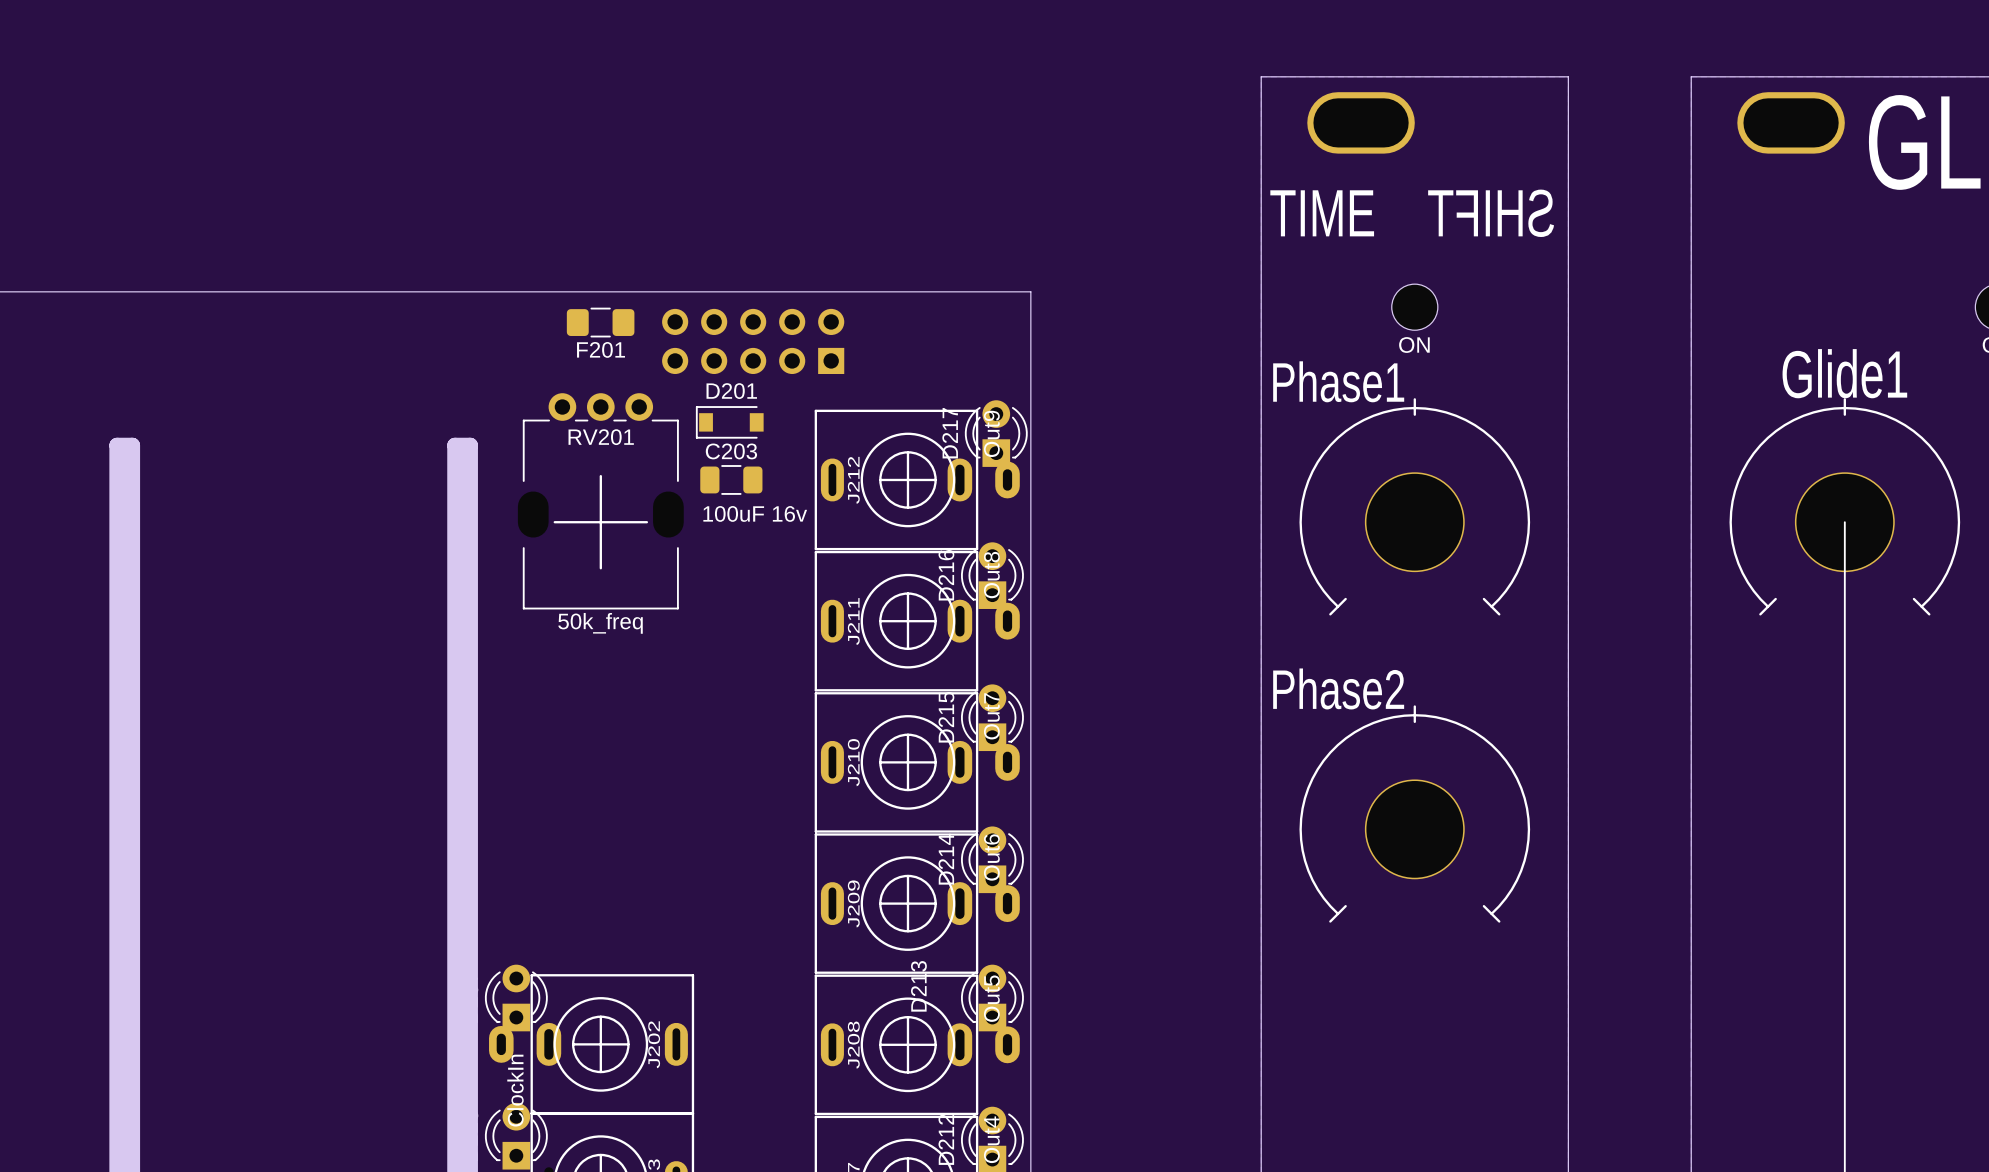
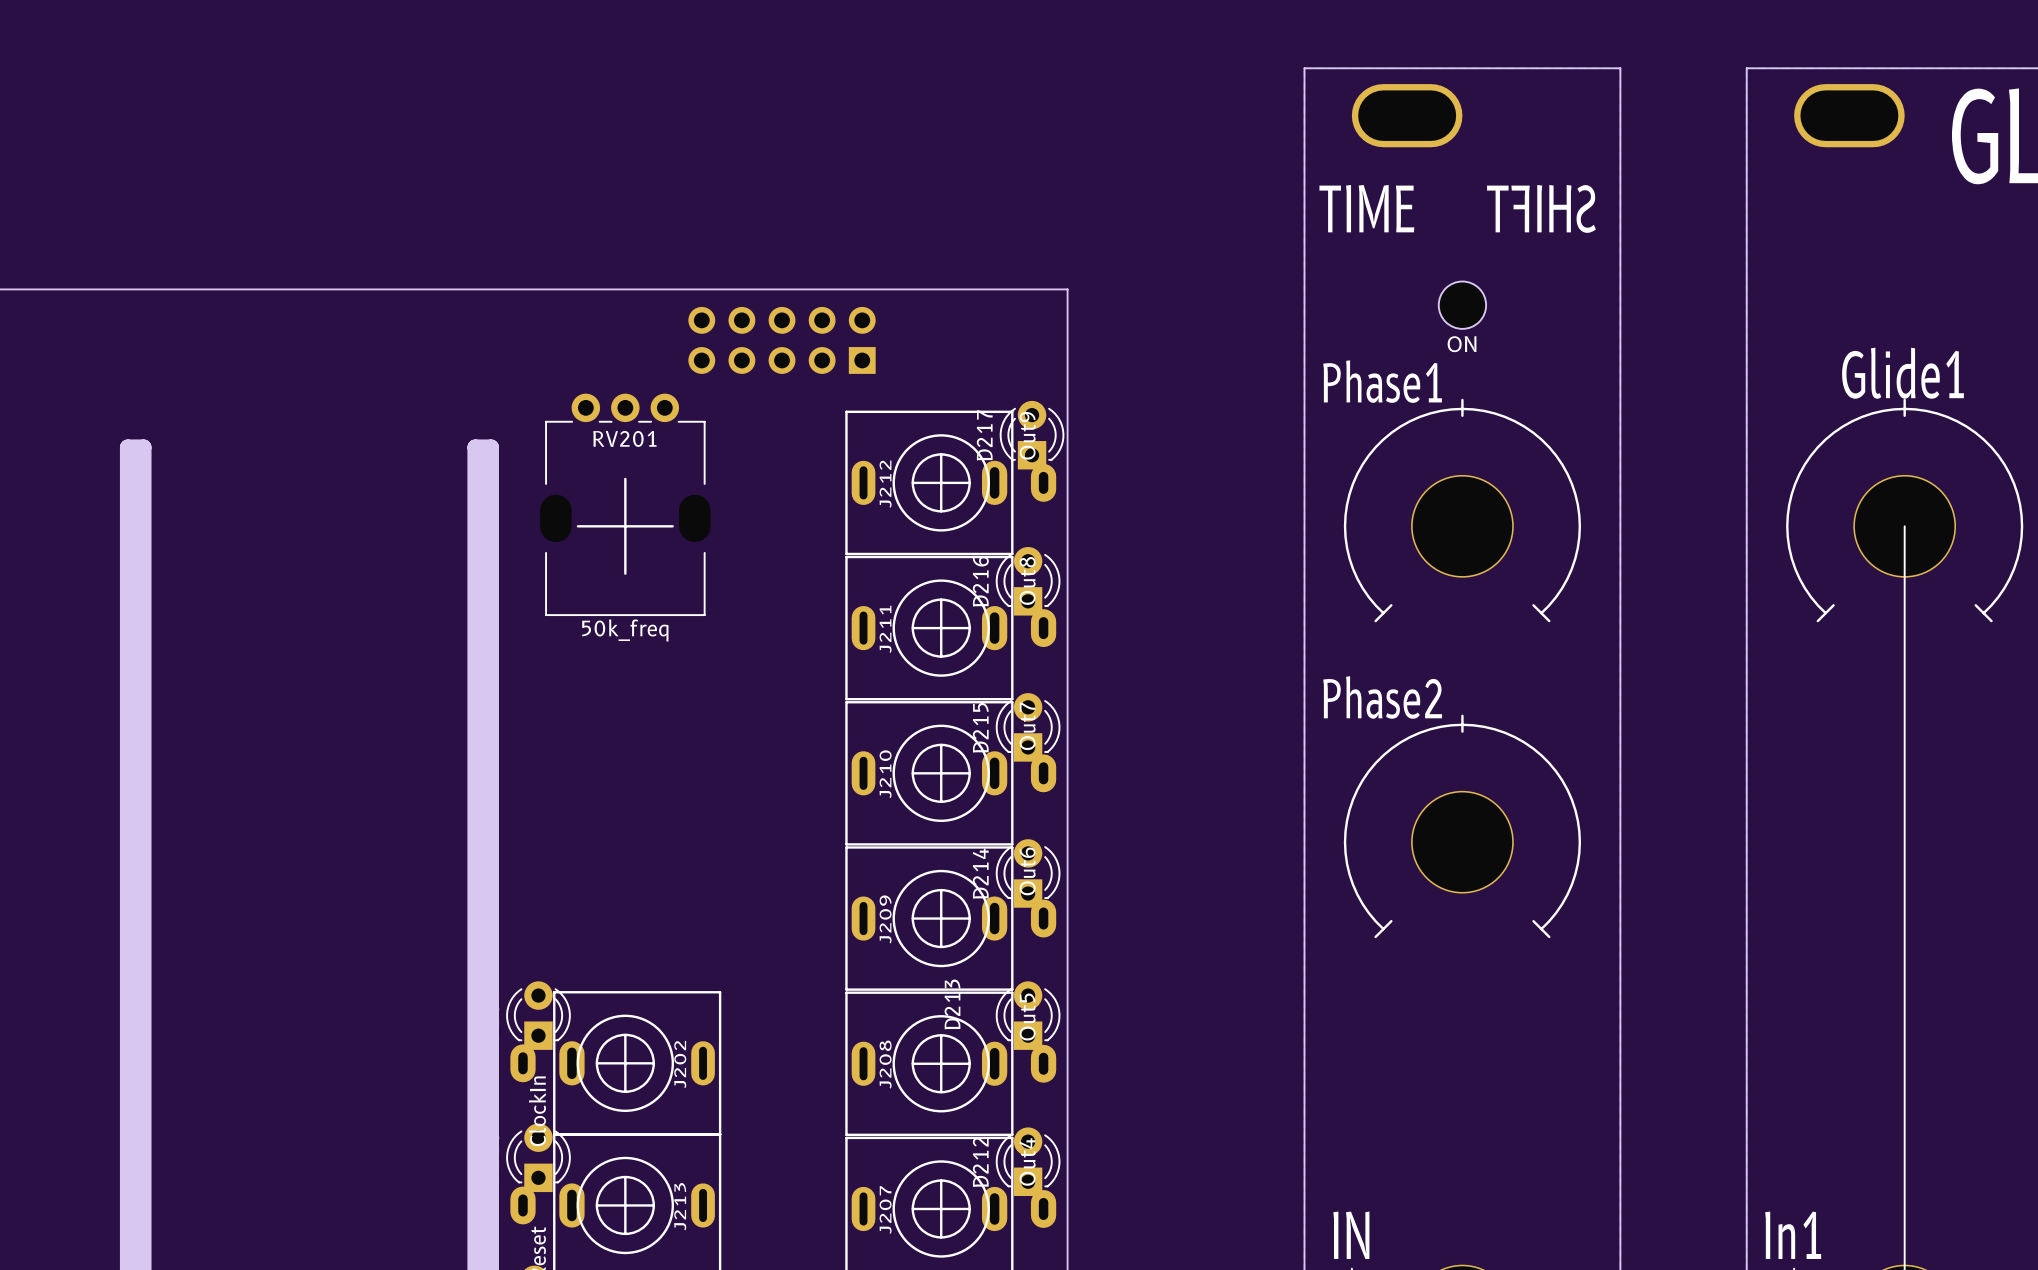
F201: (600, 322) -> none
D201: (729, 422) -> none
C203: 100uF 16v (731, 479) -> none

